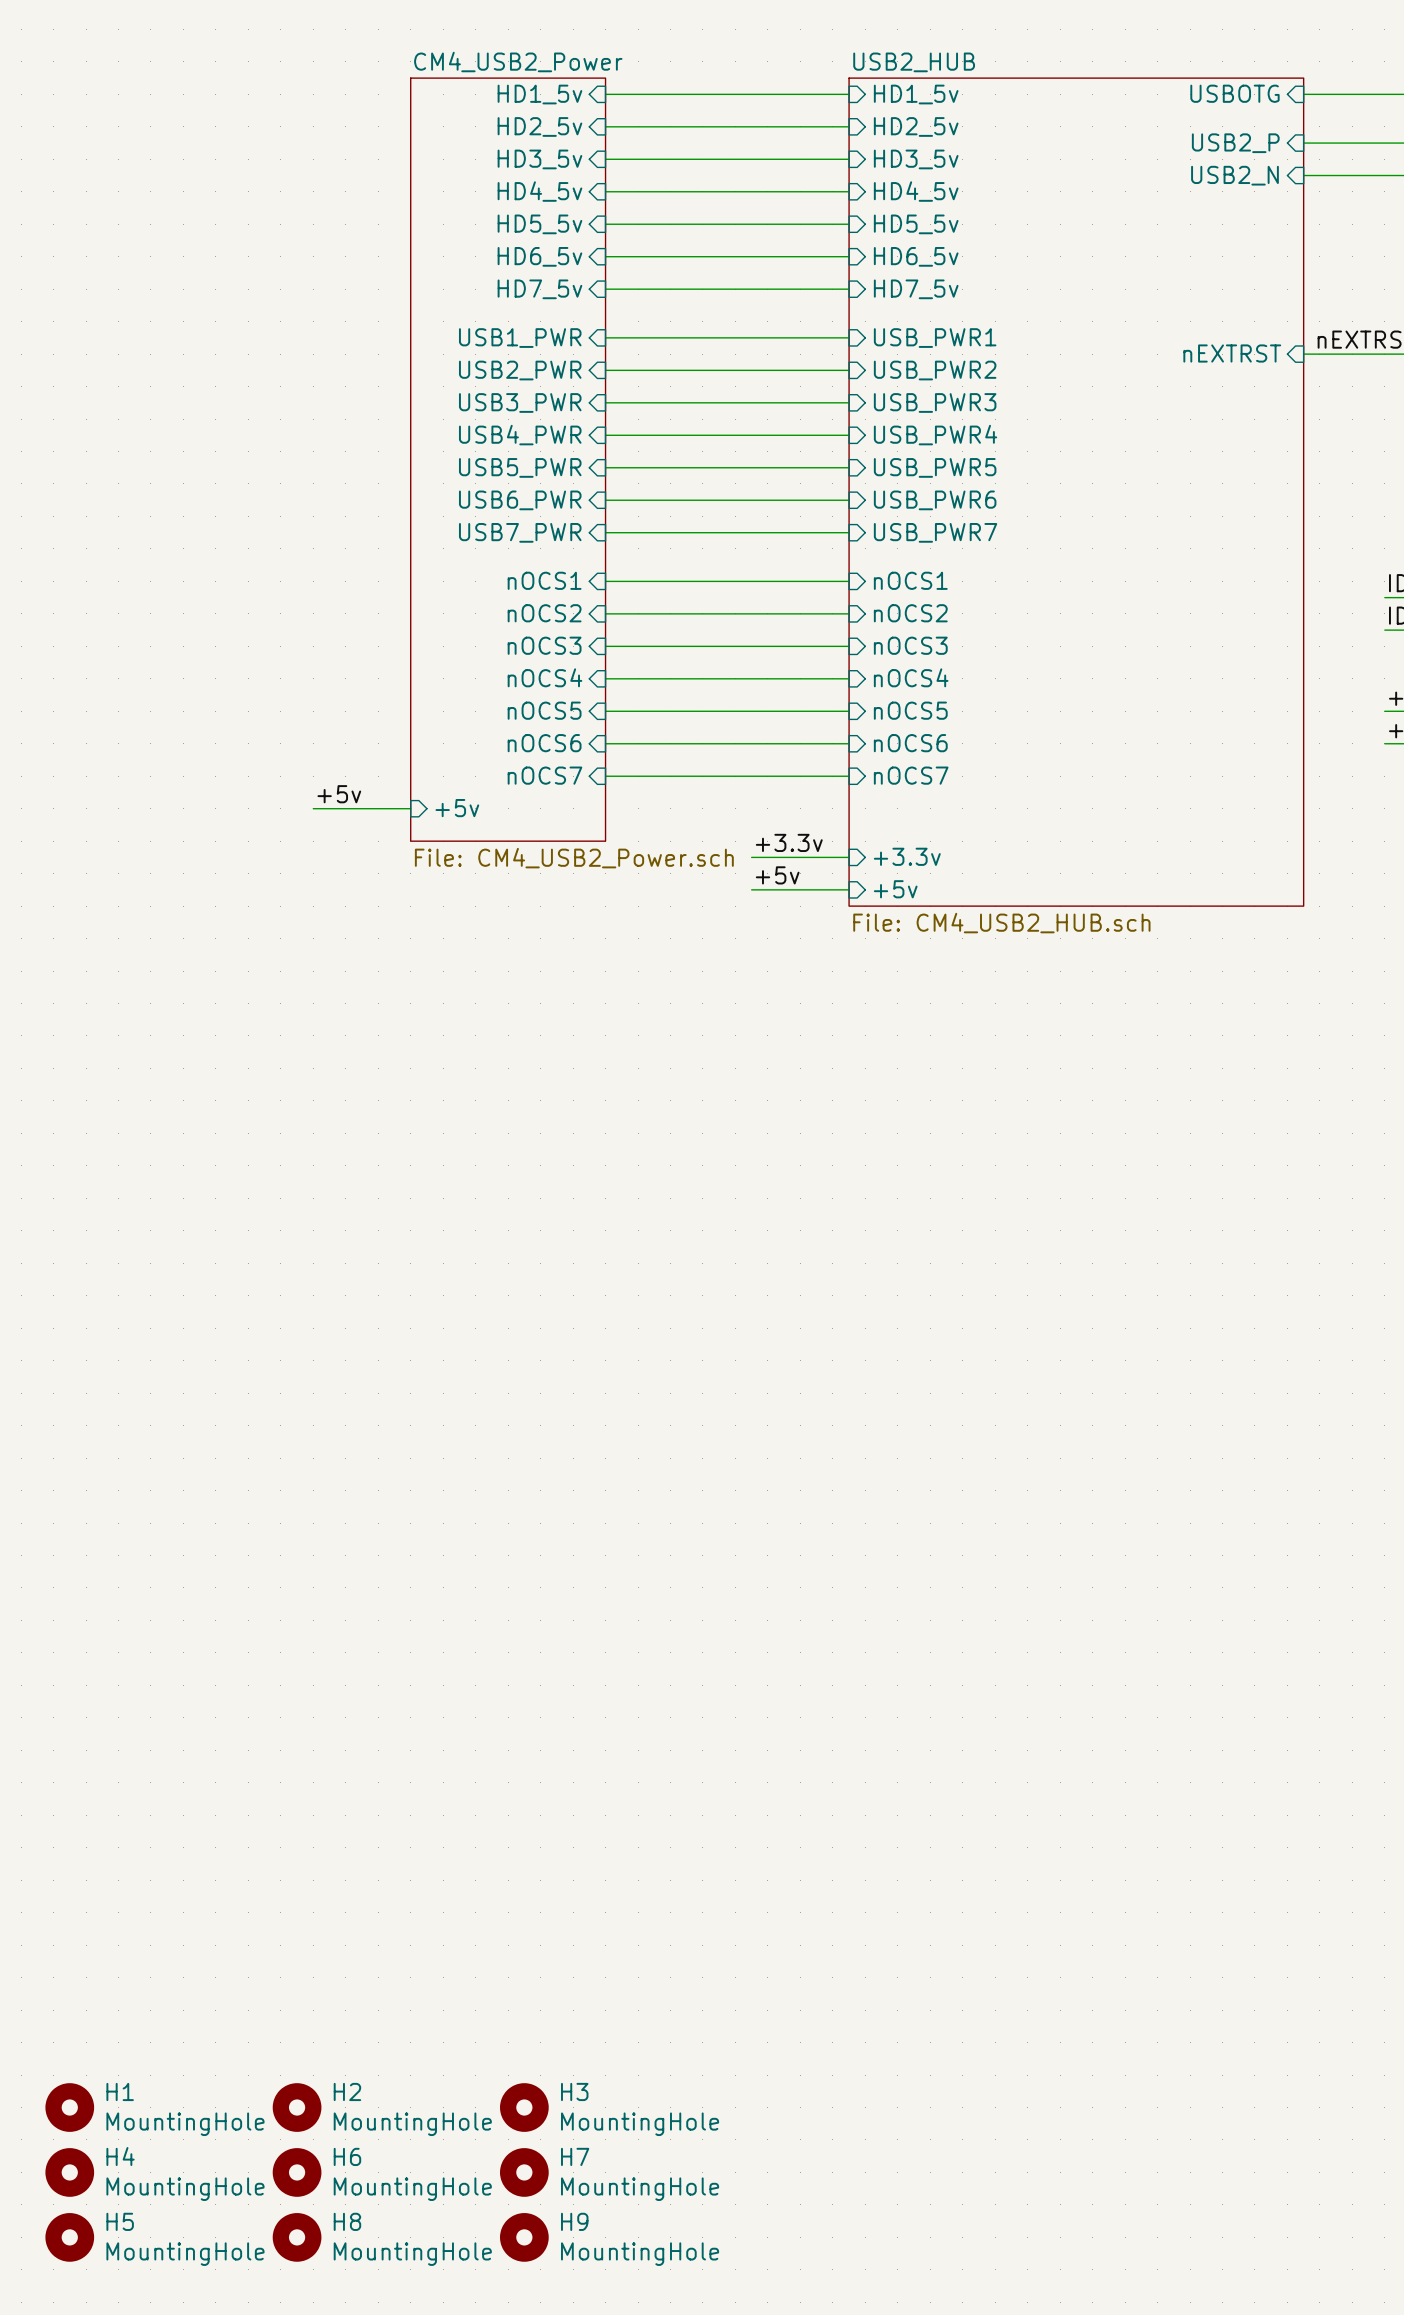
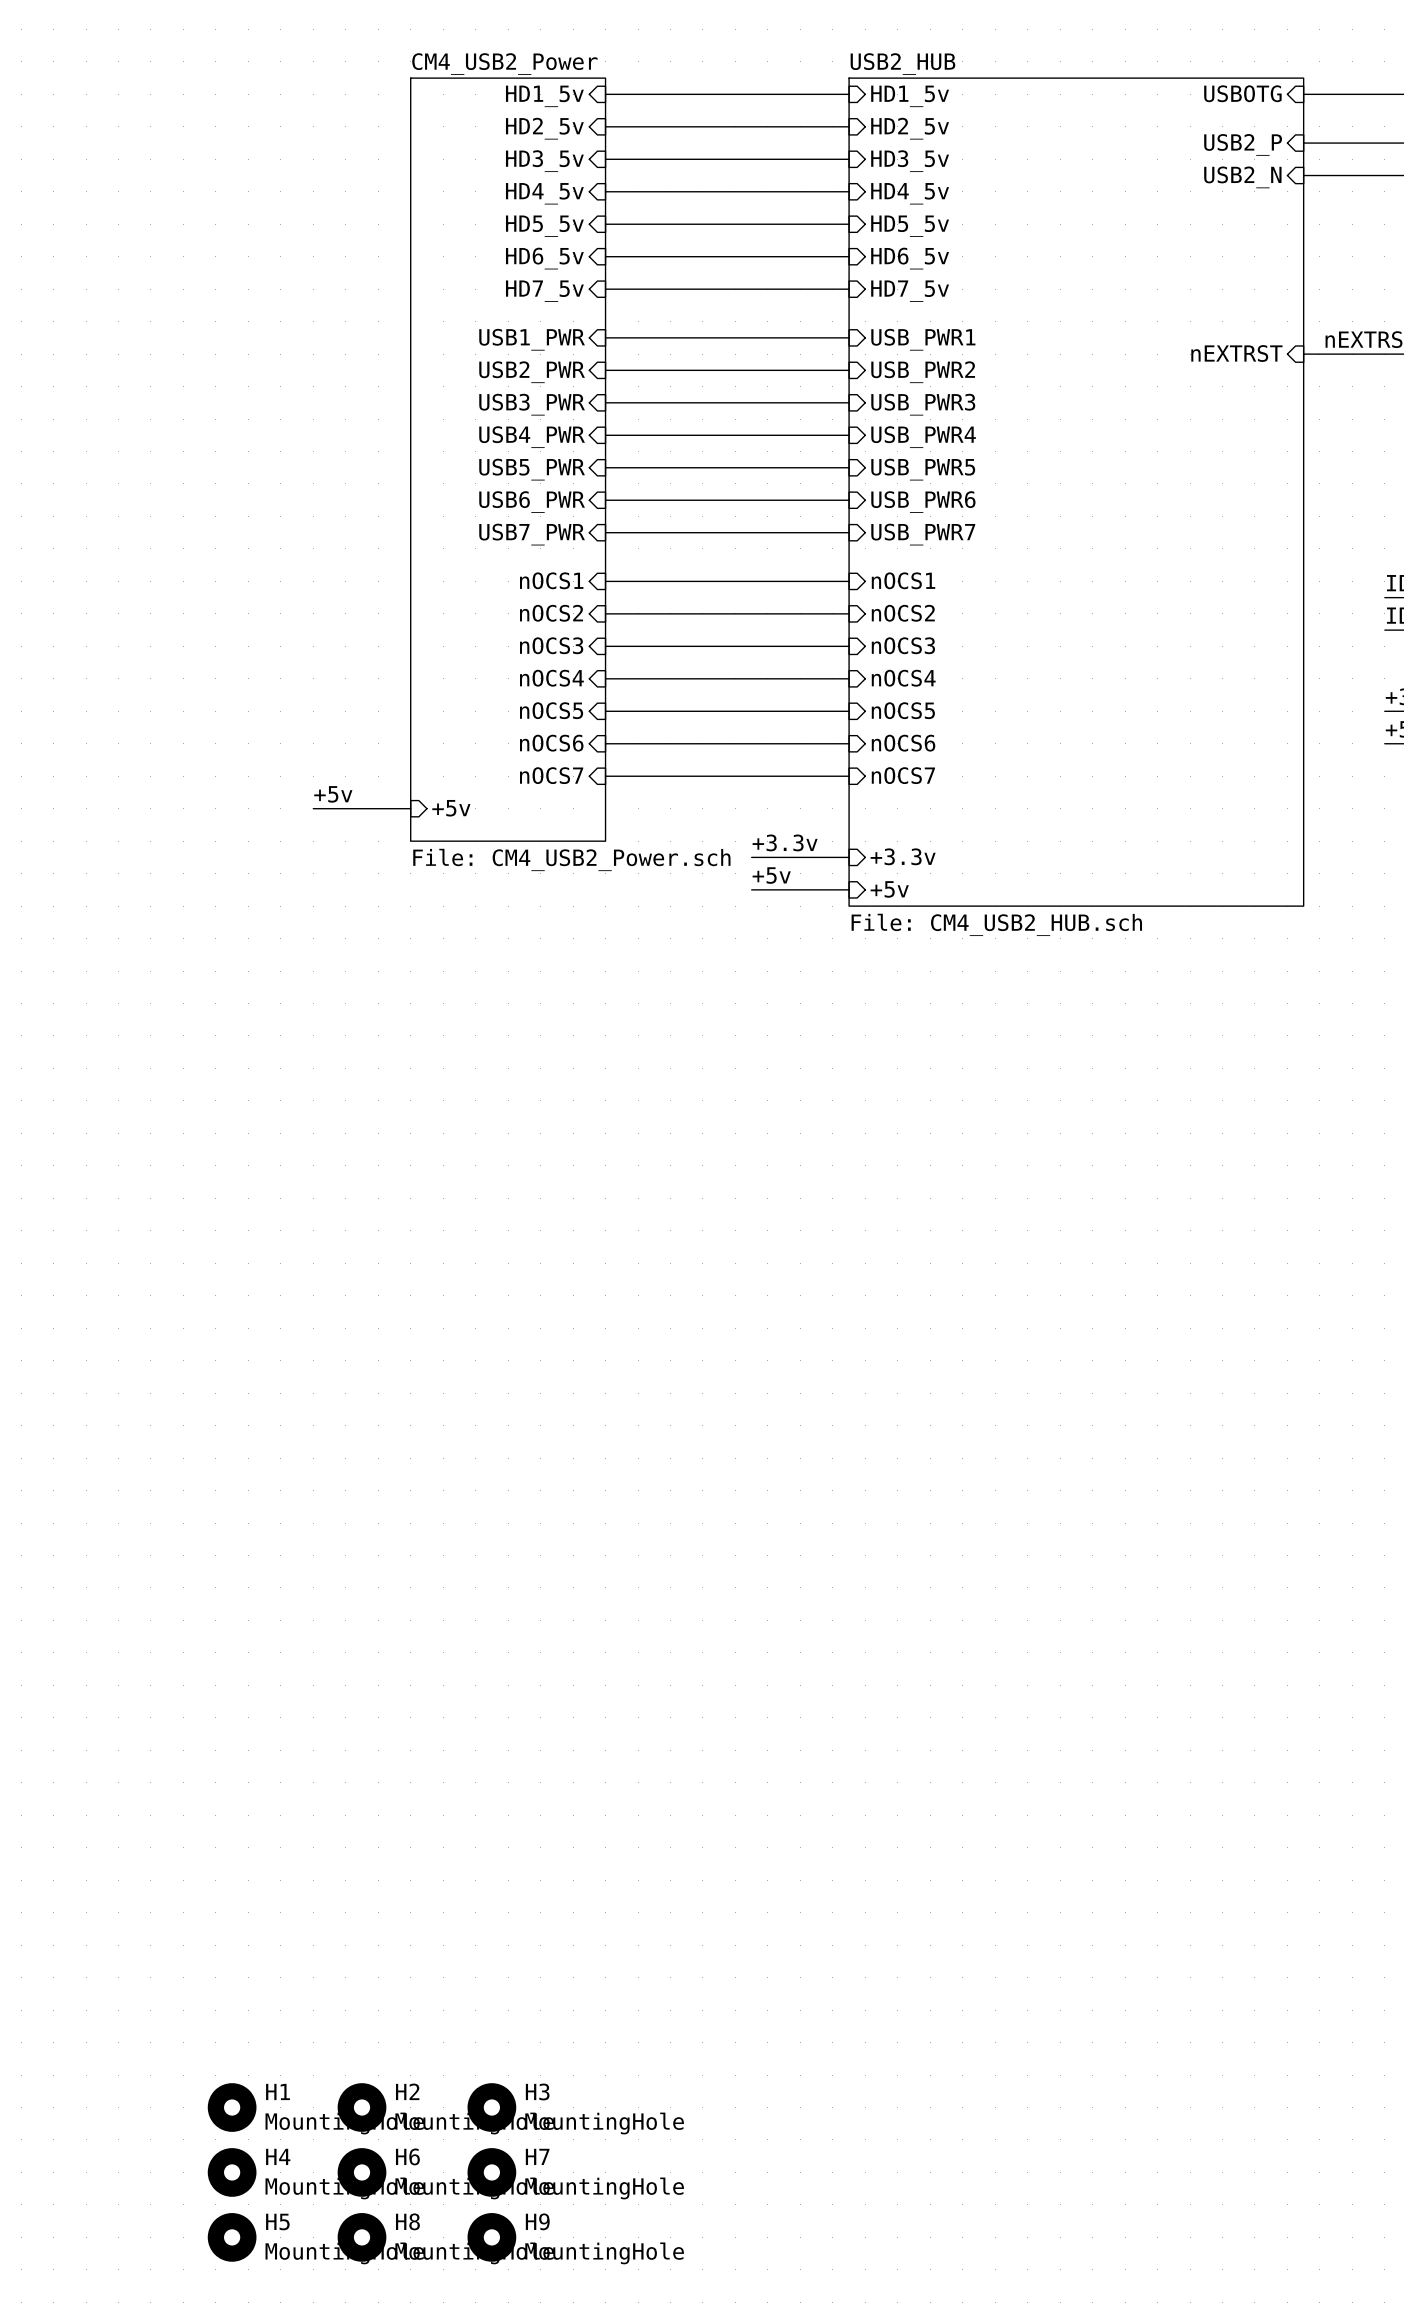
H1 position: (69, 2107) -> (232, 2107)
H2 position: (297, 2107) -> (362, 2107)
H3 position: (524, 2107) -> (491, 2107)
H4 position: (69, 2172) -> (232, 2172)
H6 position: (297, 2172) -> (362, 2172)
H7 position: (524, 2172) -> (491, 2172)
H5 position: (69, 2237) -> (232, 2237)
H8 position: (297, 2237) -> (362, 2237)
H9 position: (524, 2237) -> (491, 2237)

